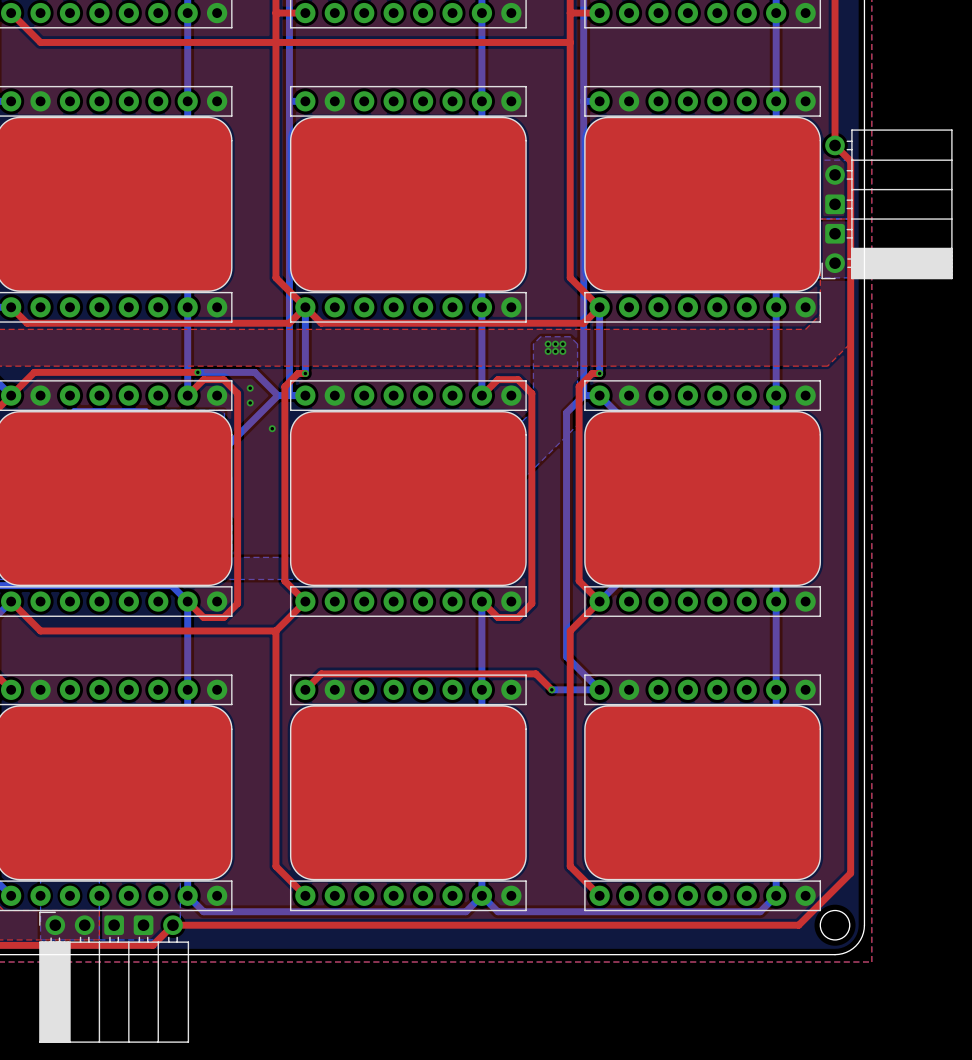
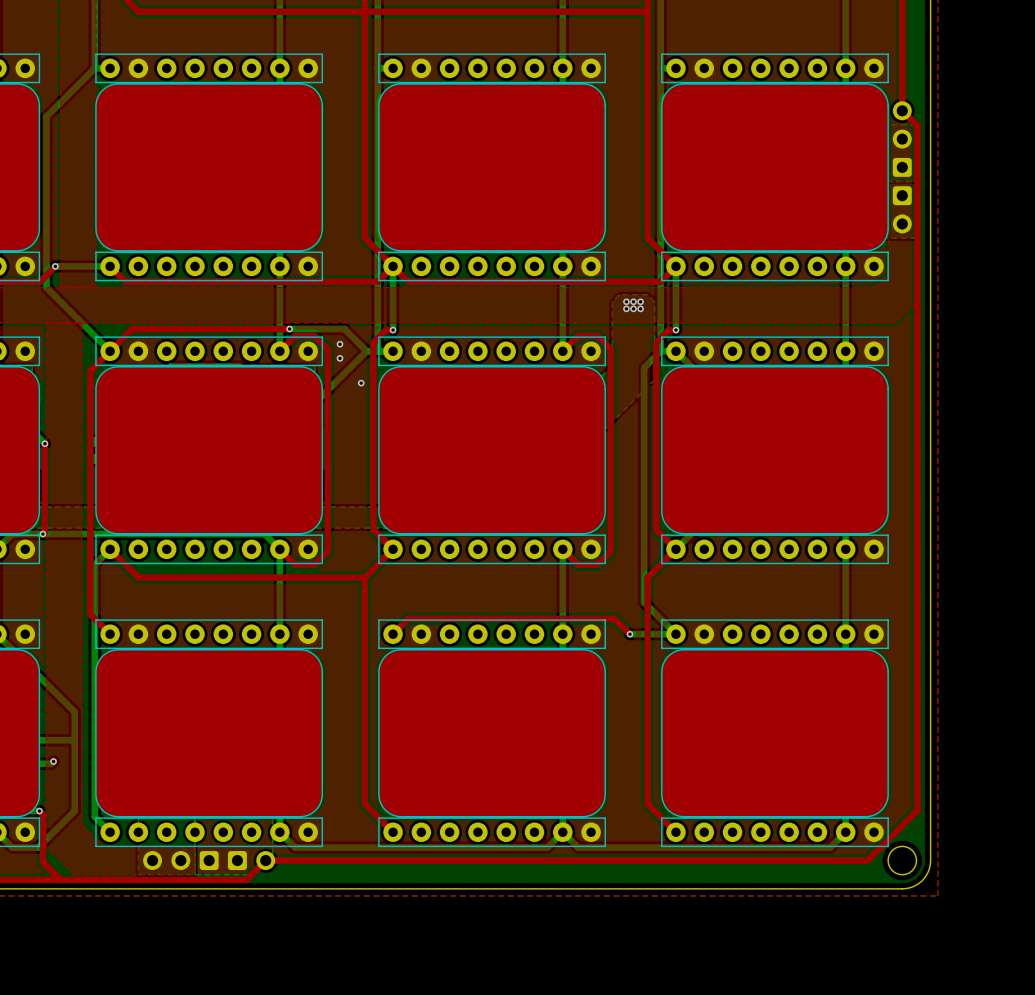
part: none -> (902, 167)
part: (887, 204) -> none
part: none -> (209, 860)
part: (114, 977) -> none

